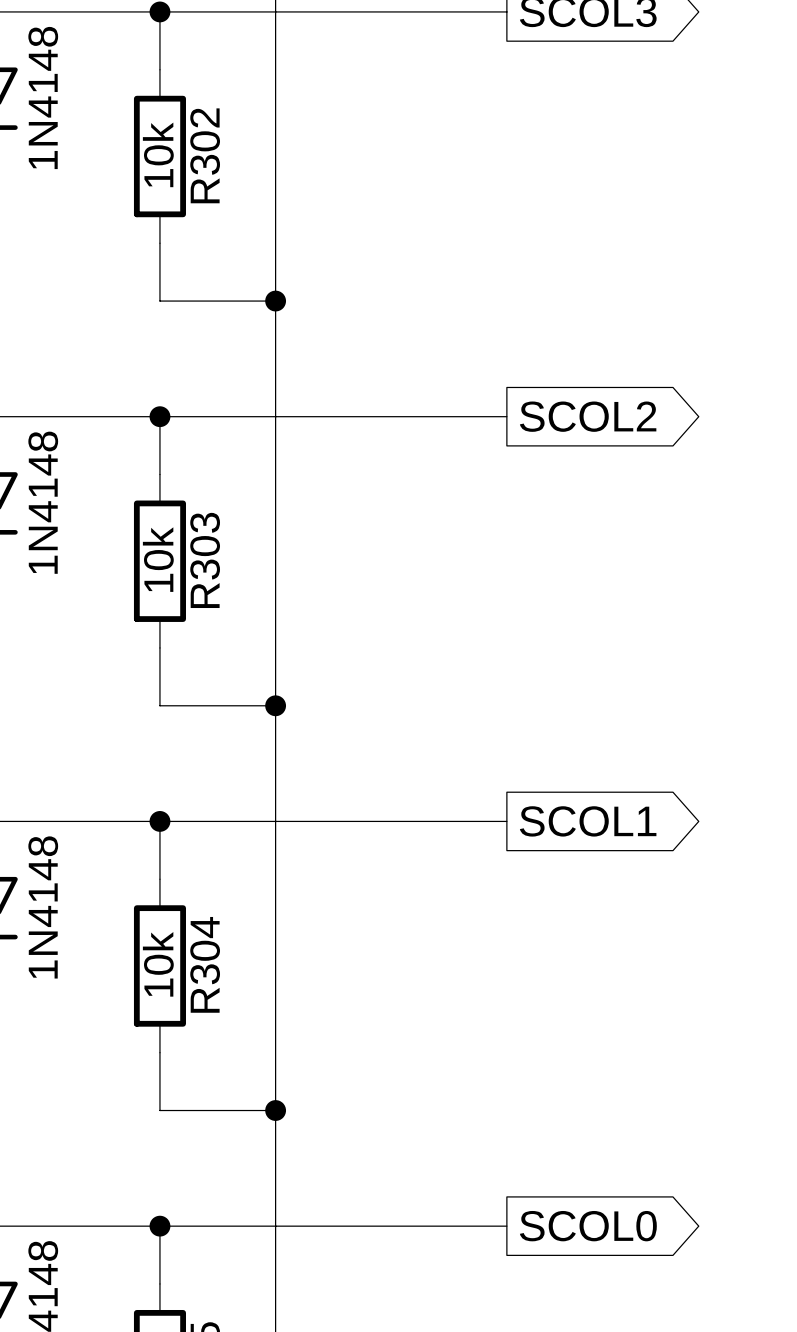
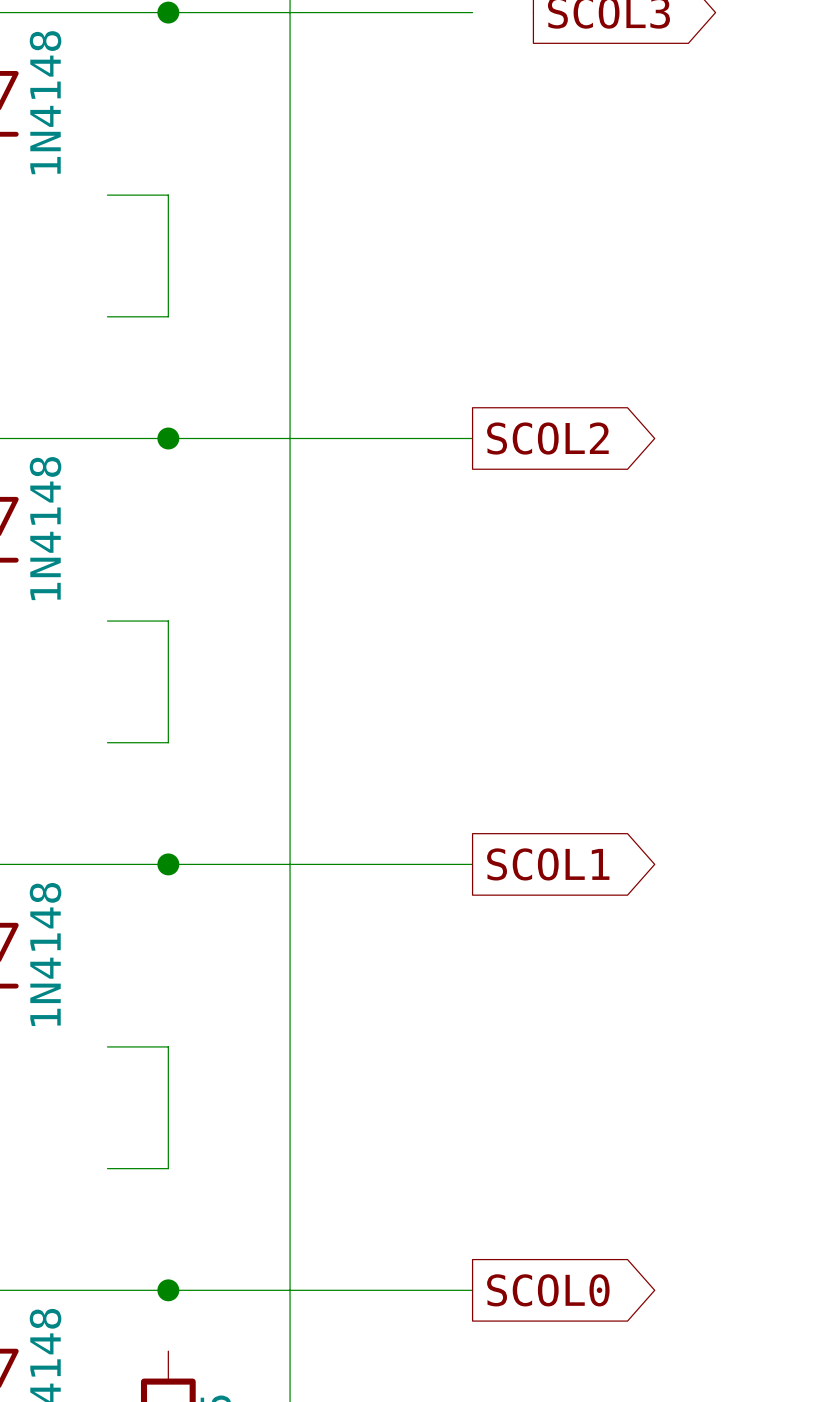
wire: (159, 11) (159, 69) -> none
wire: (449, 11) (506, 11) -> none
R302: 10k (159, 156) -> none
wire: none -> (107, 195) (168, 195) (168, 255)
wire: (159, 301) (275, 301) -> (168, 316) (107, 316)
junction: (275, 301) -> none
wire: (159, 416) (159, 474) -> none
wire: (449, 416) (506, 416) -> none
global label position: SCOL2 (588, 416) -> SCOL2 (547, 438)
R303: 10k (159, 561) -> none
wire: none -> (107, 621) (168, 621) (168, 681)
wire: (159, 705) (275, 705) -> (168, 742) (107, 742)
junction: (275, 705) -> none
wire: (159, 821) (159, 879) -> none
wire: (449, 821) (506, 821) -> none
global label position: SCOL1 (588, 821) -> SCOL1 (548, 864)
R304: 10k (159, 965) -> none
wire: none -> (107, 1046) (168, 1046) (168, 1107)
wire: (159, 1110) (275, 1110) -> (168, 1168) (107, 1168)
junction: (275, 1110) -> none
wire: (159, 1226) (159, 1283) -> none
wire: (449, 1226) (506, 1226) -> none
global label position: SCOL0 (588, 1226) -> SCOL0 (548, 1290)

